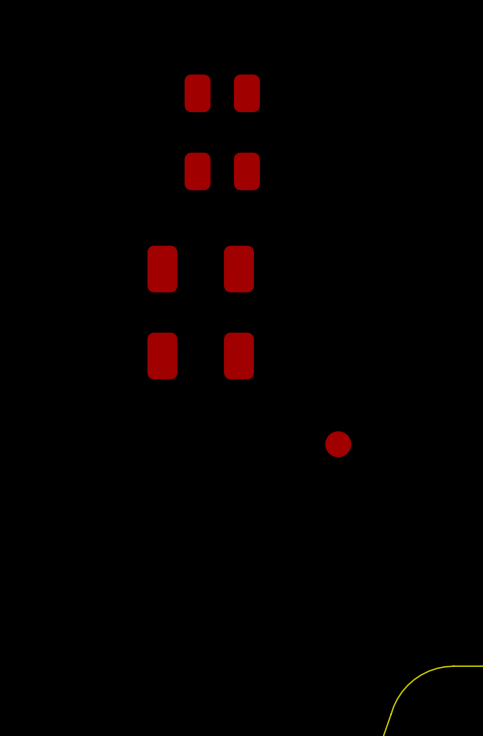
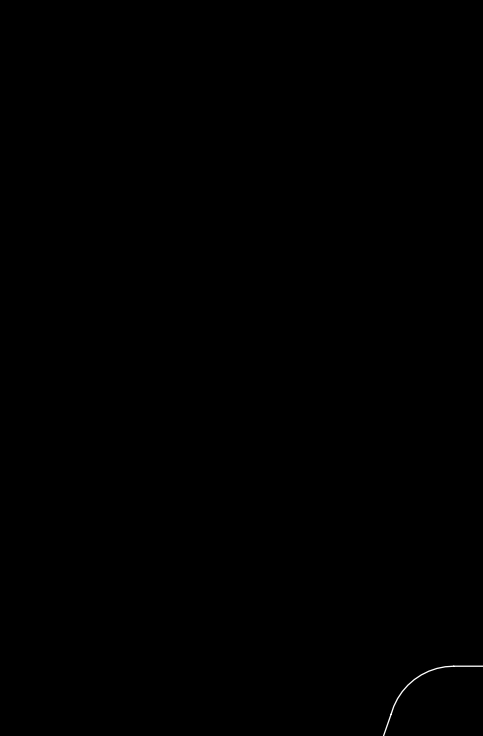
part: (222, 93) -> none
part: (222, 171) -> none
part: (200, 269) -> none
part: (200, 356) -> none
part: (338, 444) -> none

